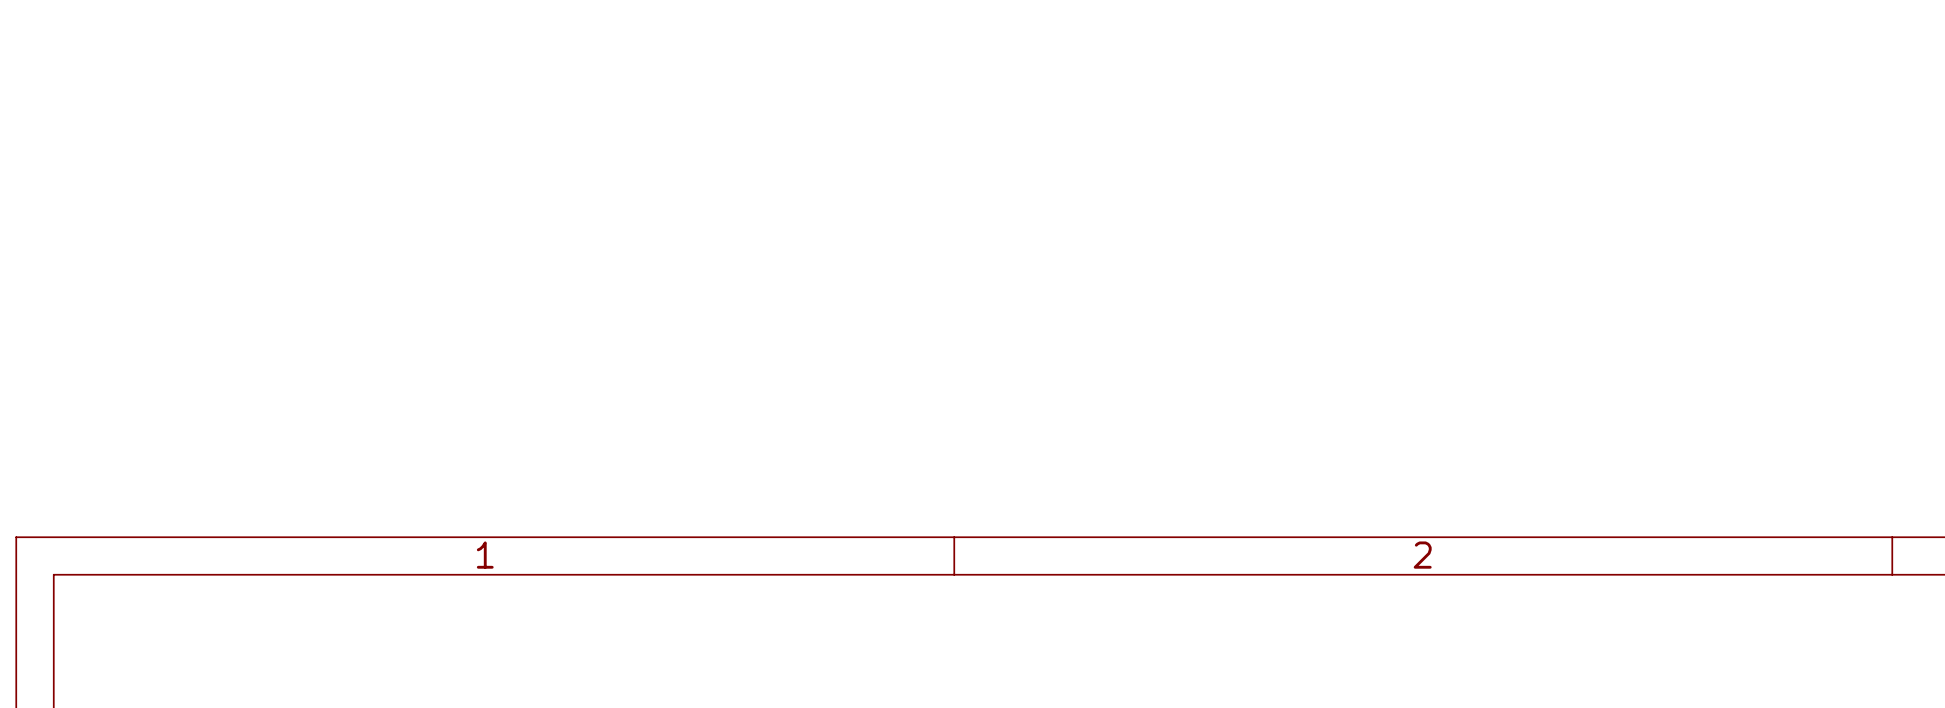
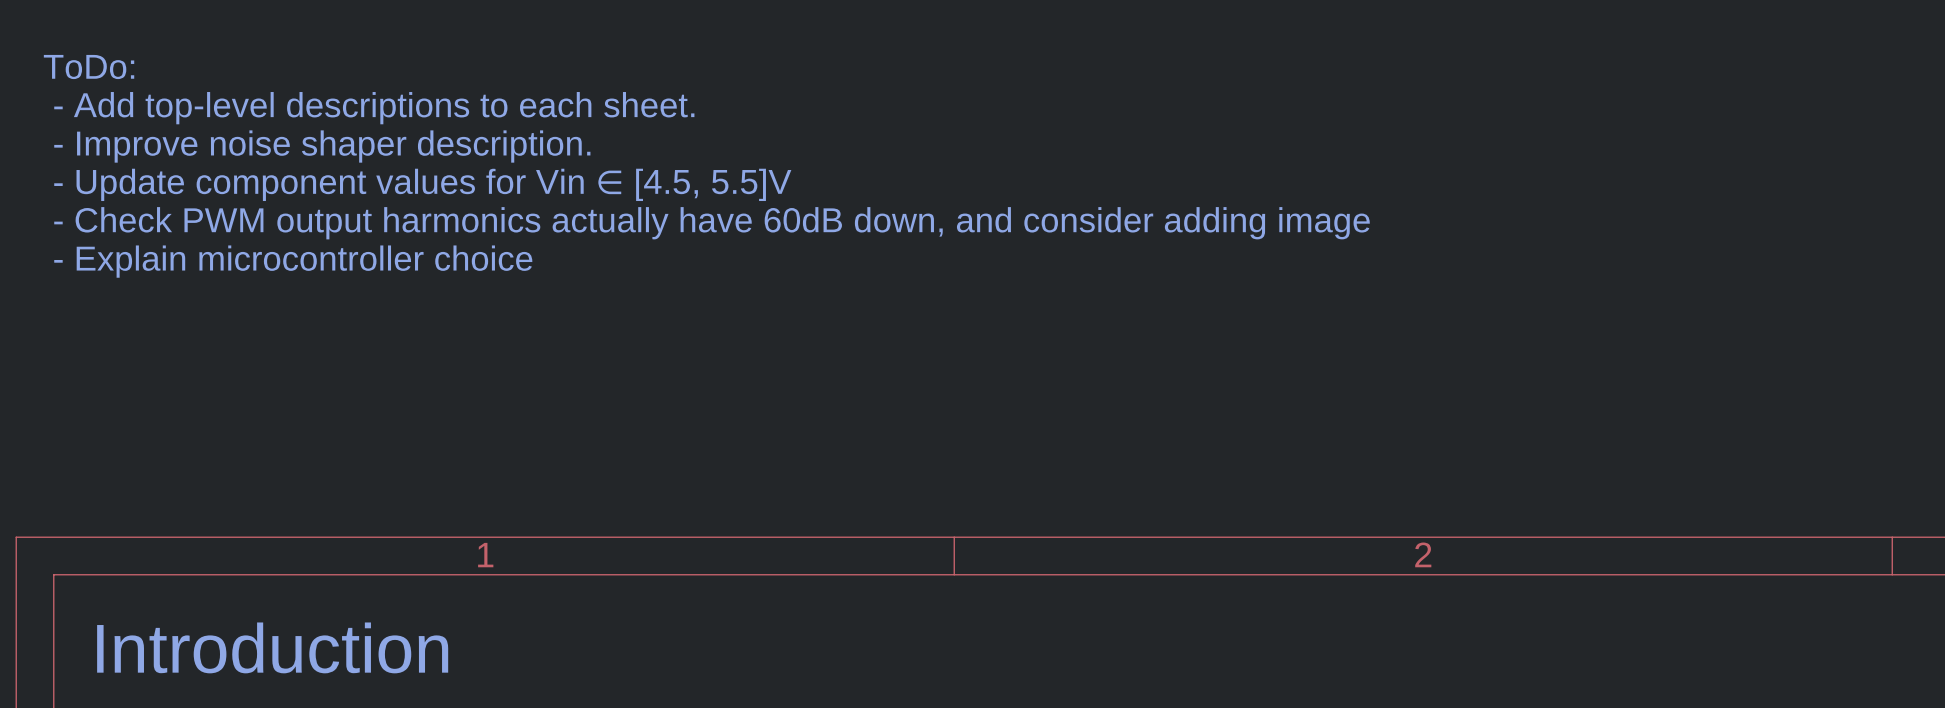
text: none -> ToDo: (89, 67)
text: none -> - Add top-level descriptions to each sheet. (374, 108)
text: none -> - Improve noise shaper description. (322, 146)
text: none -> - Update component values for Vin ∈ [4.5, 5.5]V (422, 184)
text: none -> - Check PWM output harmonics actually have 60dB down, and consider adding image (712, 223)
text: none -> - Explain microcontroller choice (293, 261)
text: none -> Introduction (272, 647)

